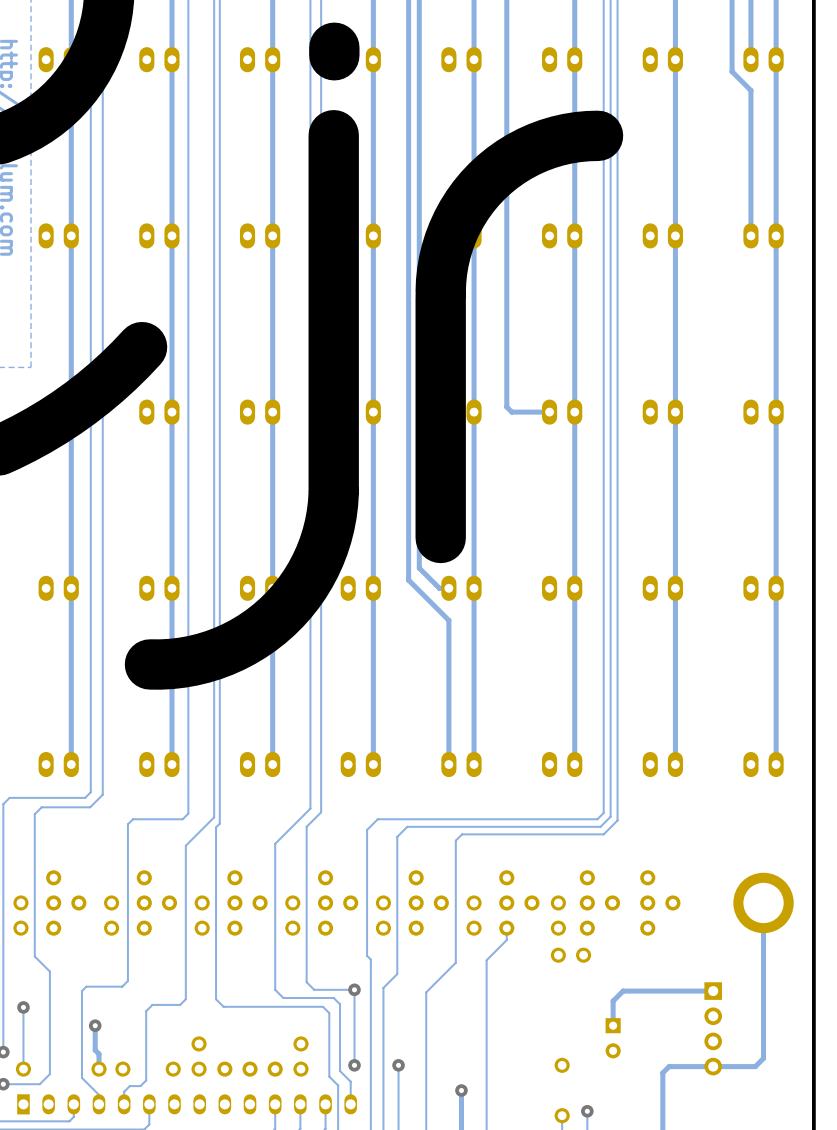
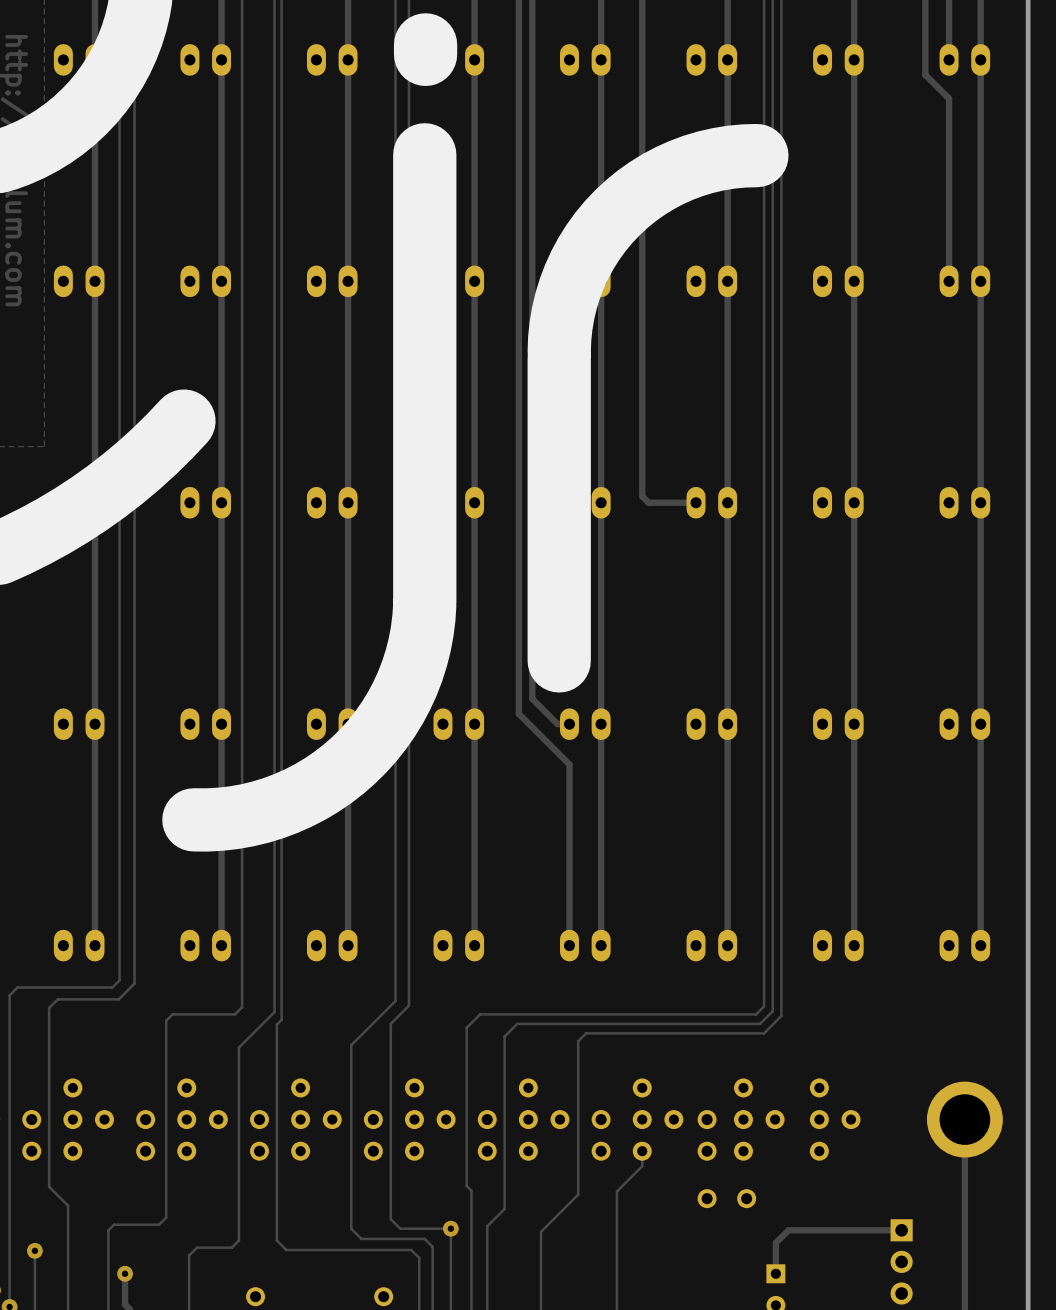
part: (570, 955) -> none
part: none -> (726, 1198)

